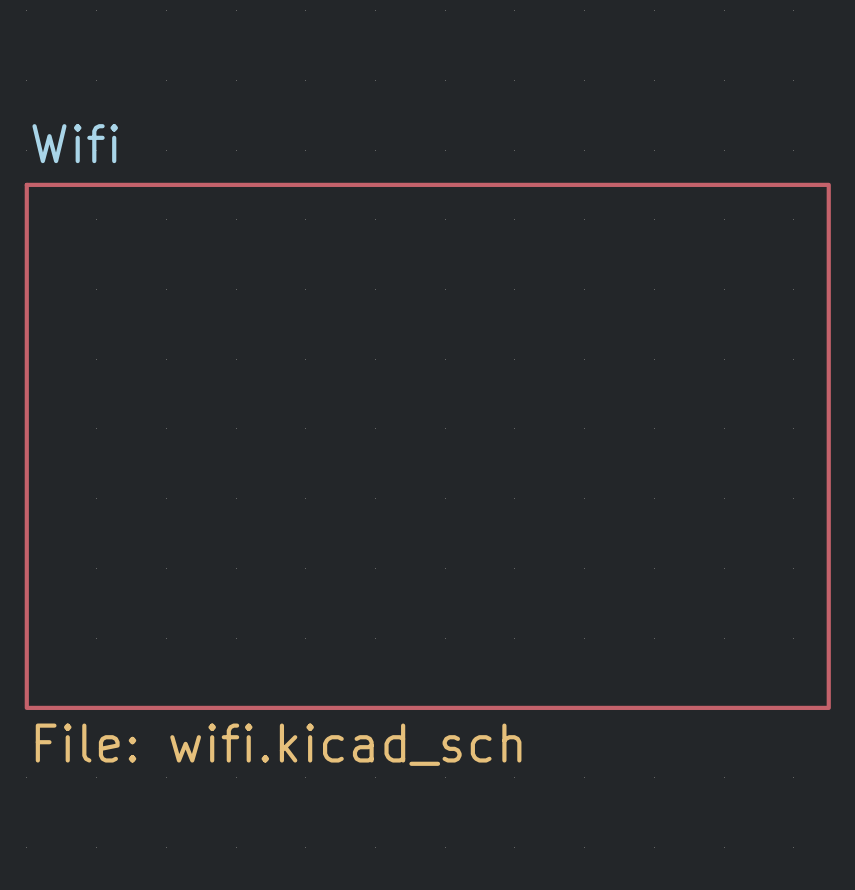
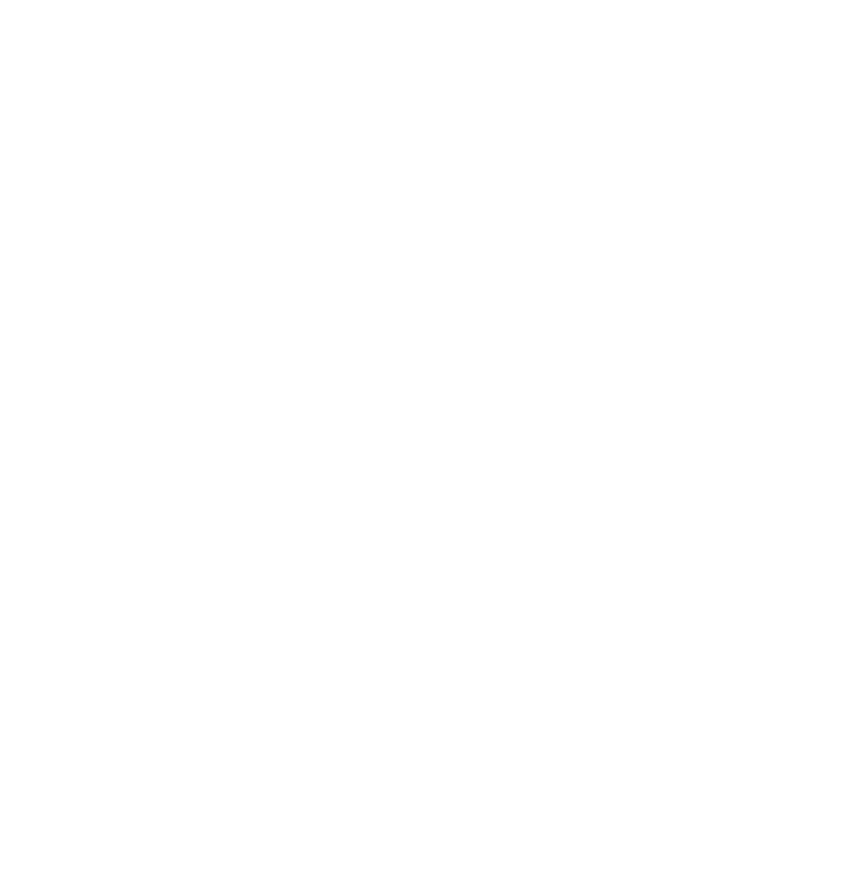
sheet Wifi: File: wifi.kicad_sch (427, 446) -> none

